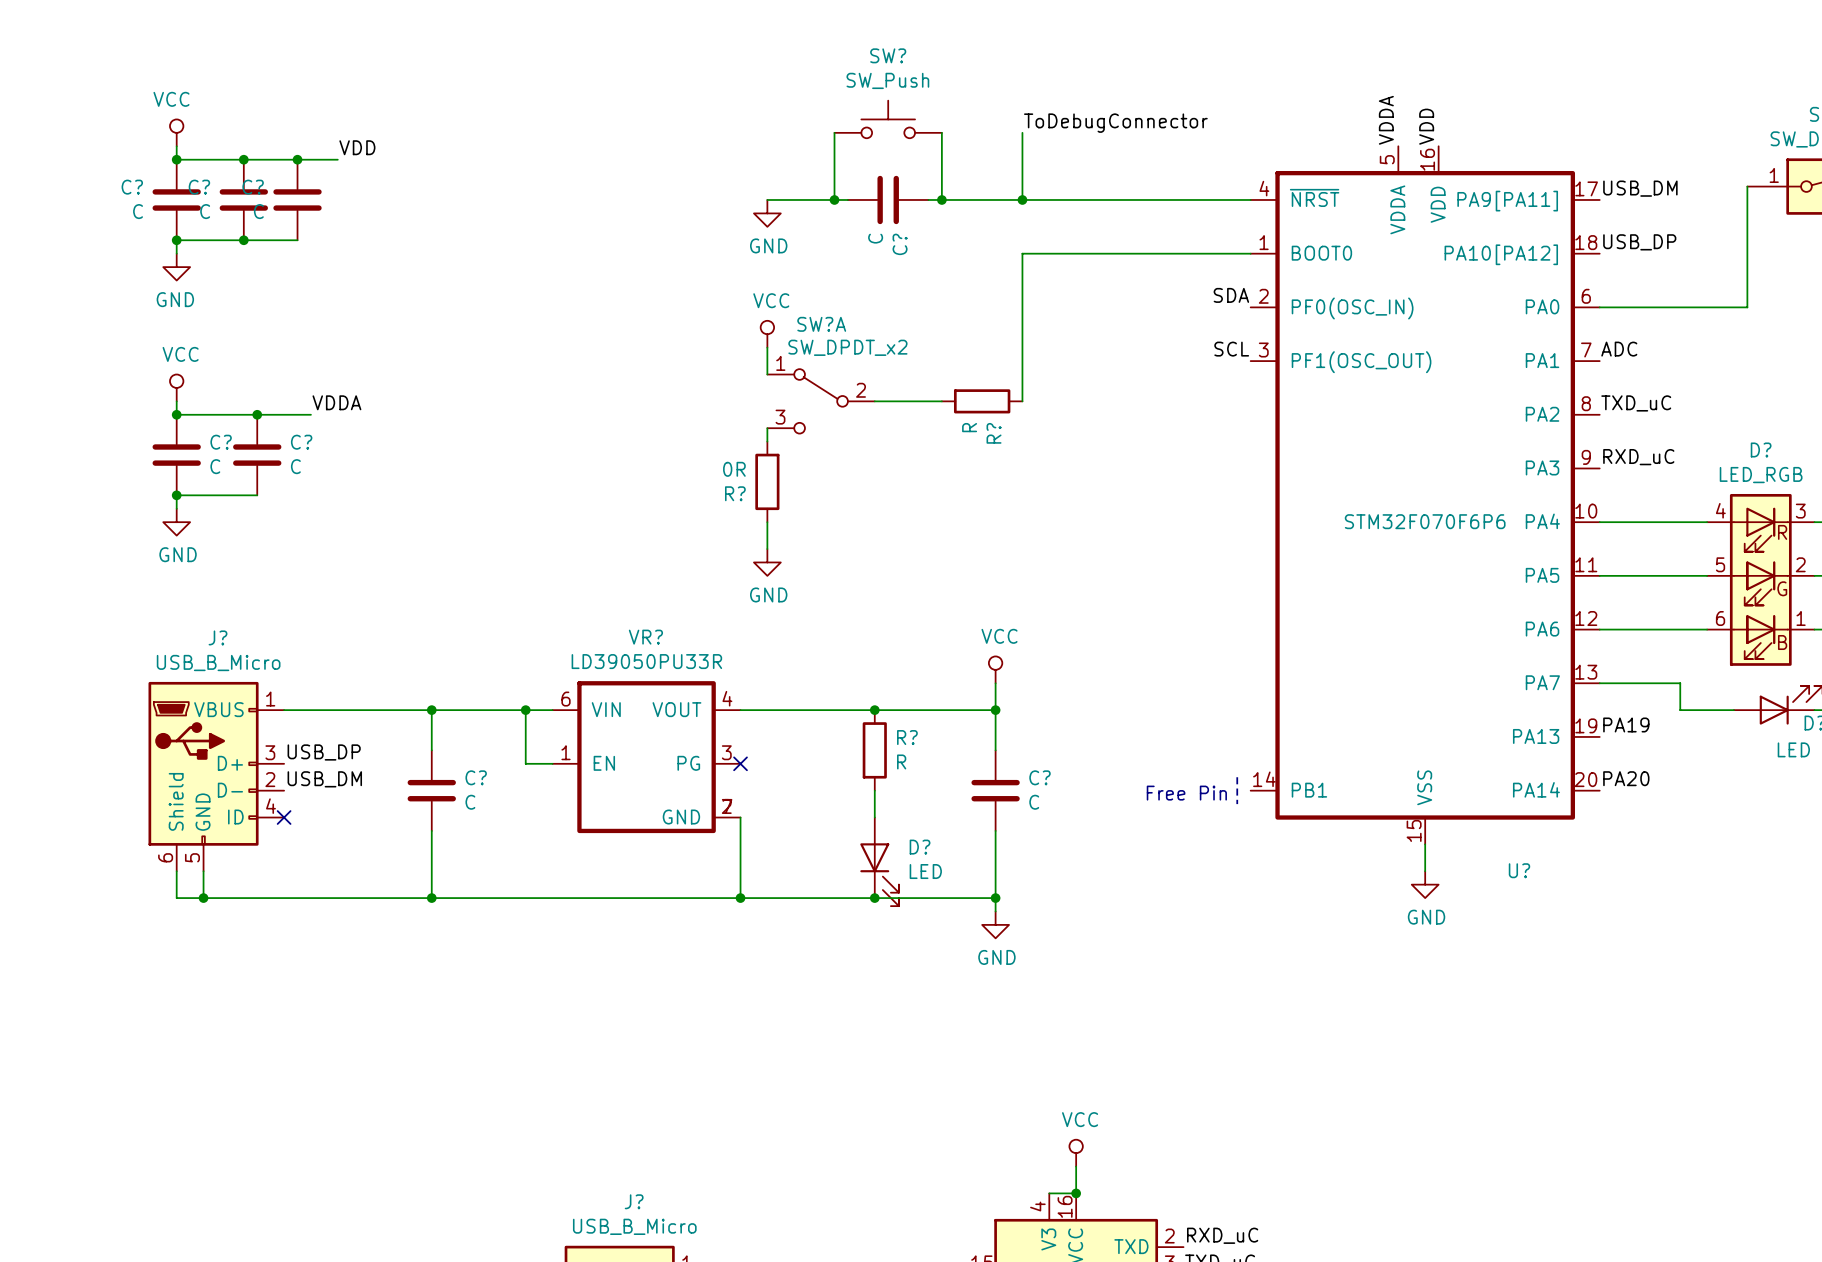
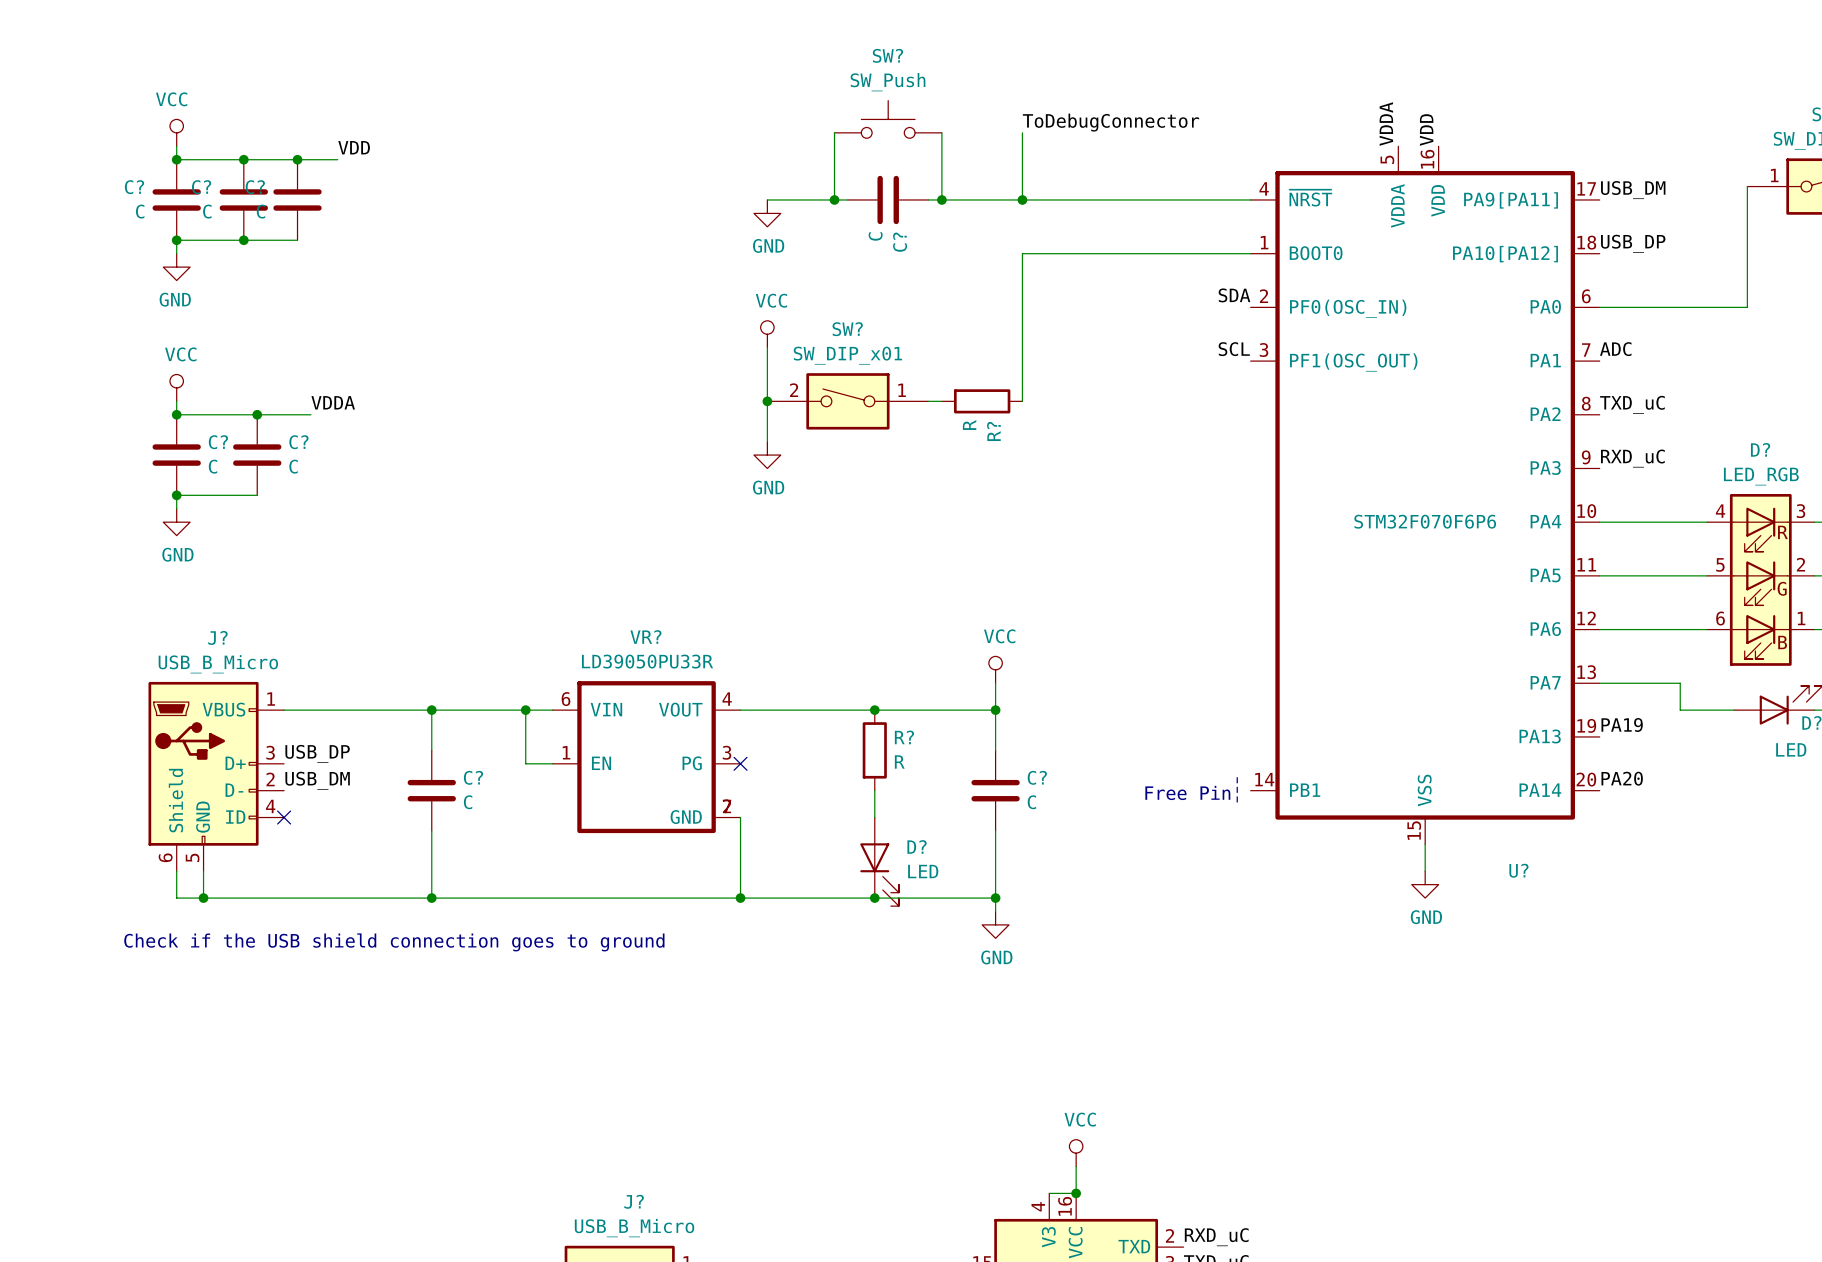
wire: none -> (767, 374) (767, 428)
junction: none -> (767, 401)
SW?A: SW_DPDT_x2 (821, 401) -> none
SW?: none -> SW_DIP_x01 (847, 401)
R?: 0R (767, 481) -> none
wire: (767, 522) (767, 549) -> none
power symbol position: GND (767, 562) -> GND (767, 455)
text: none -> Check if the USB shield connection goes to ground (394, 942)

